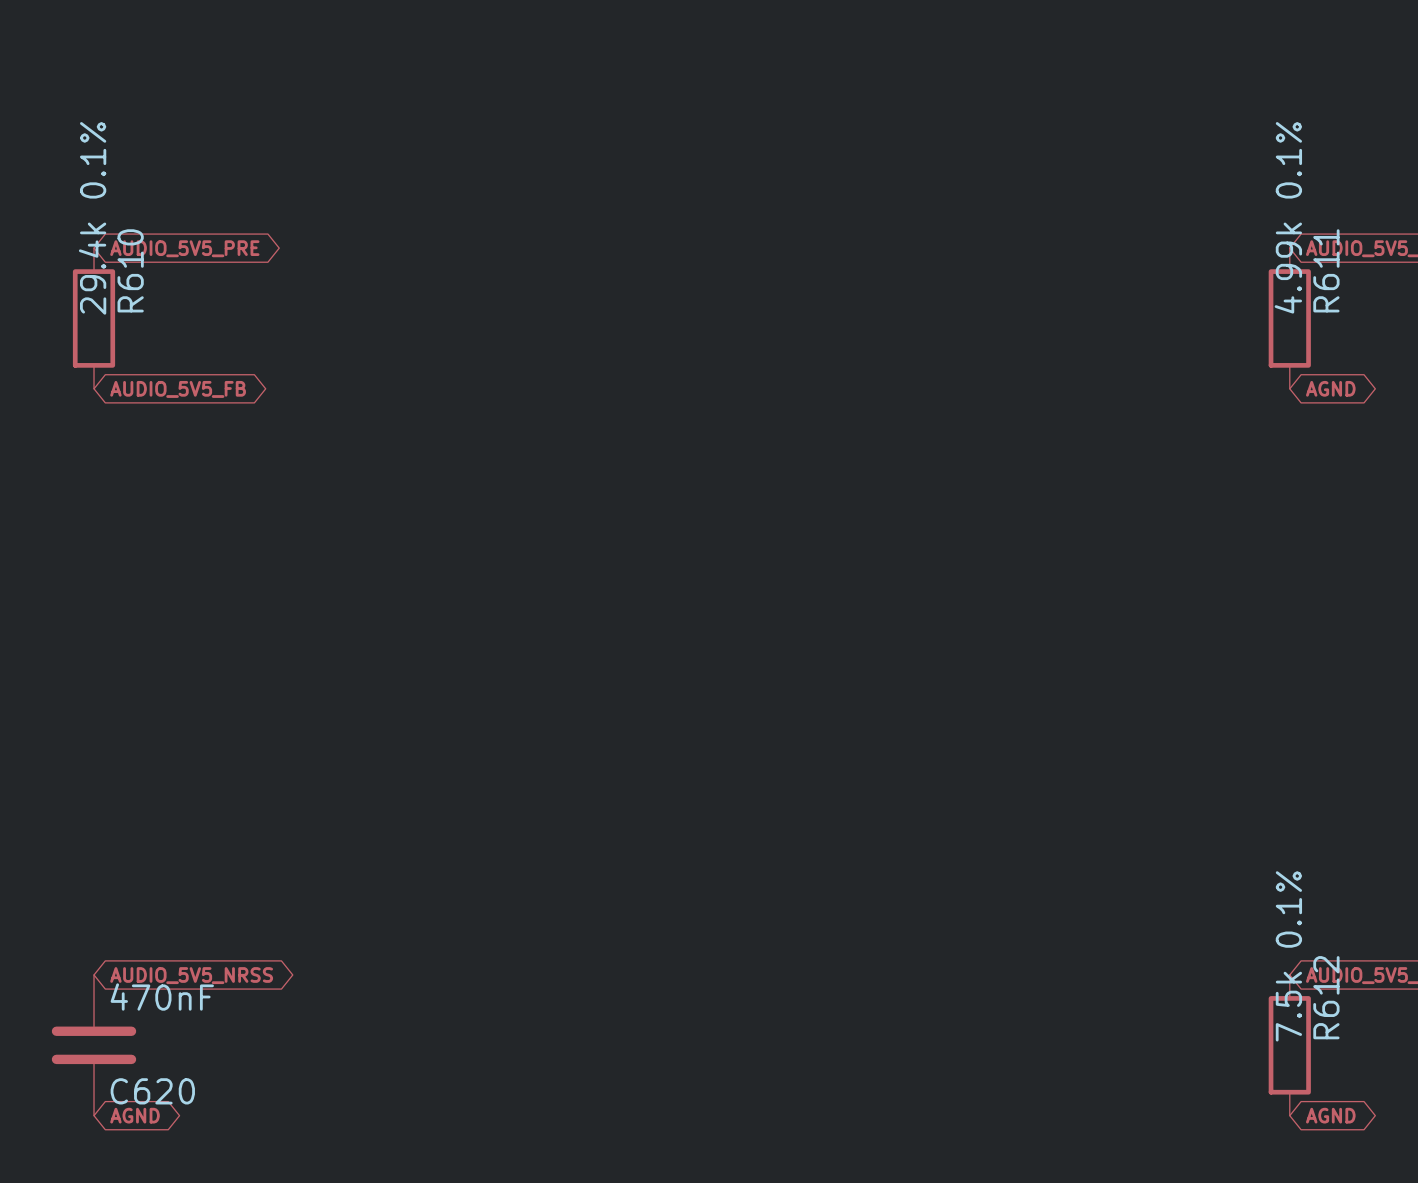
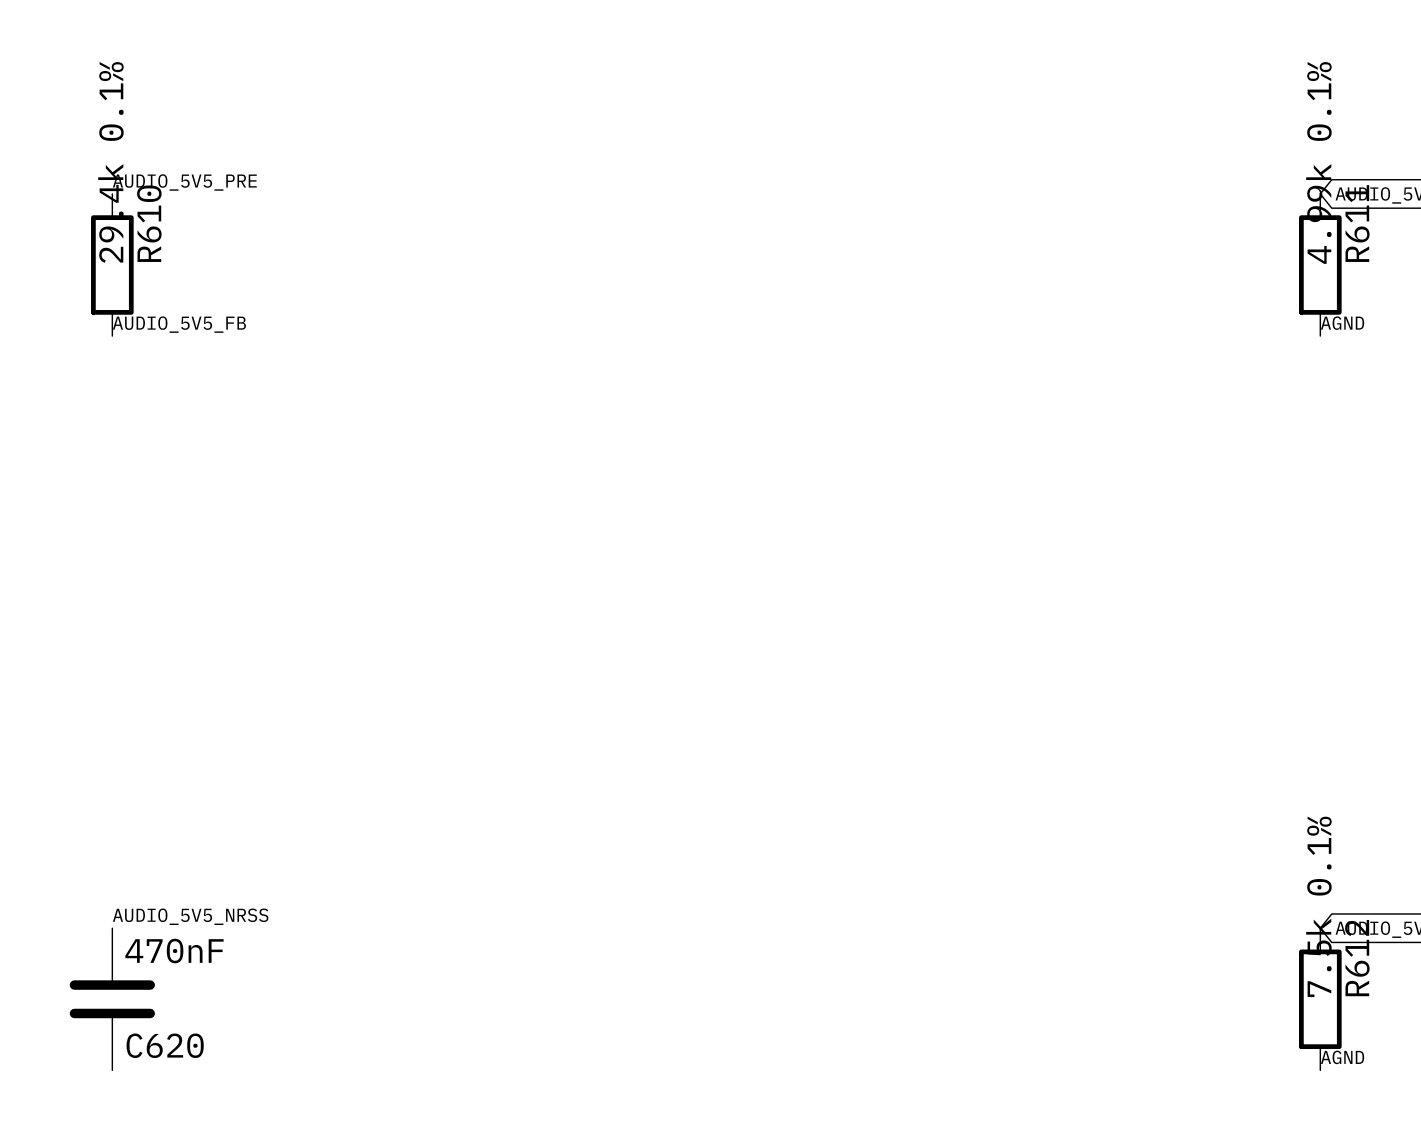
label: none -> AUDIO_5V5_PRE (184, 182)
global label: AUDIO_5V5_PRE (184, 248) -> none
label: none -> AUDIO_5V5_FB (179, 324)
label: none -> AGND (1342, 323)
global label: AGND (1330, 388) -> none
global label: AUDIO_5V5_FB (178, 389) -> none
label: none -> AUDIO_5V5_NRSS (190, 916)
global label: AUDIO_5V5_NRSS (191, 975) -> none
label: none -> AGND (1342, 1057)
global label: AGND (135, 1115) -> none
global label: AGND (1330, 1115) -> none

